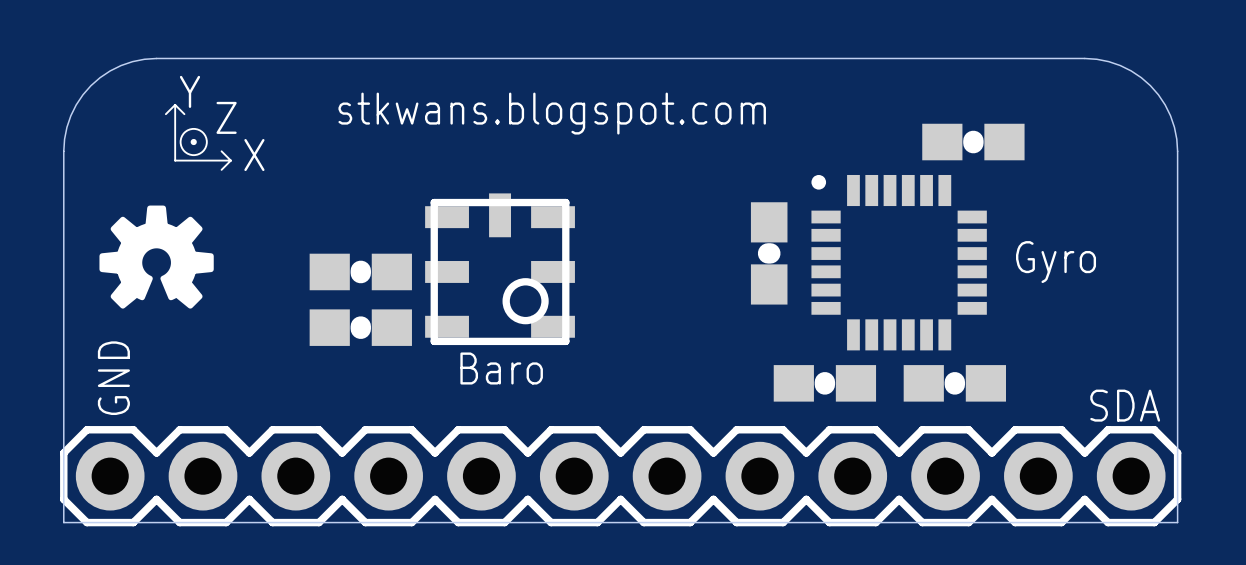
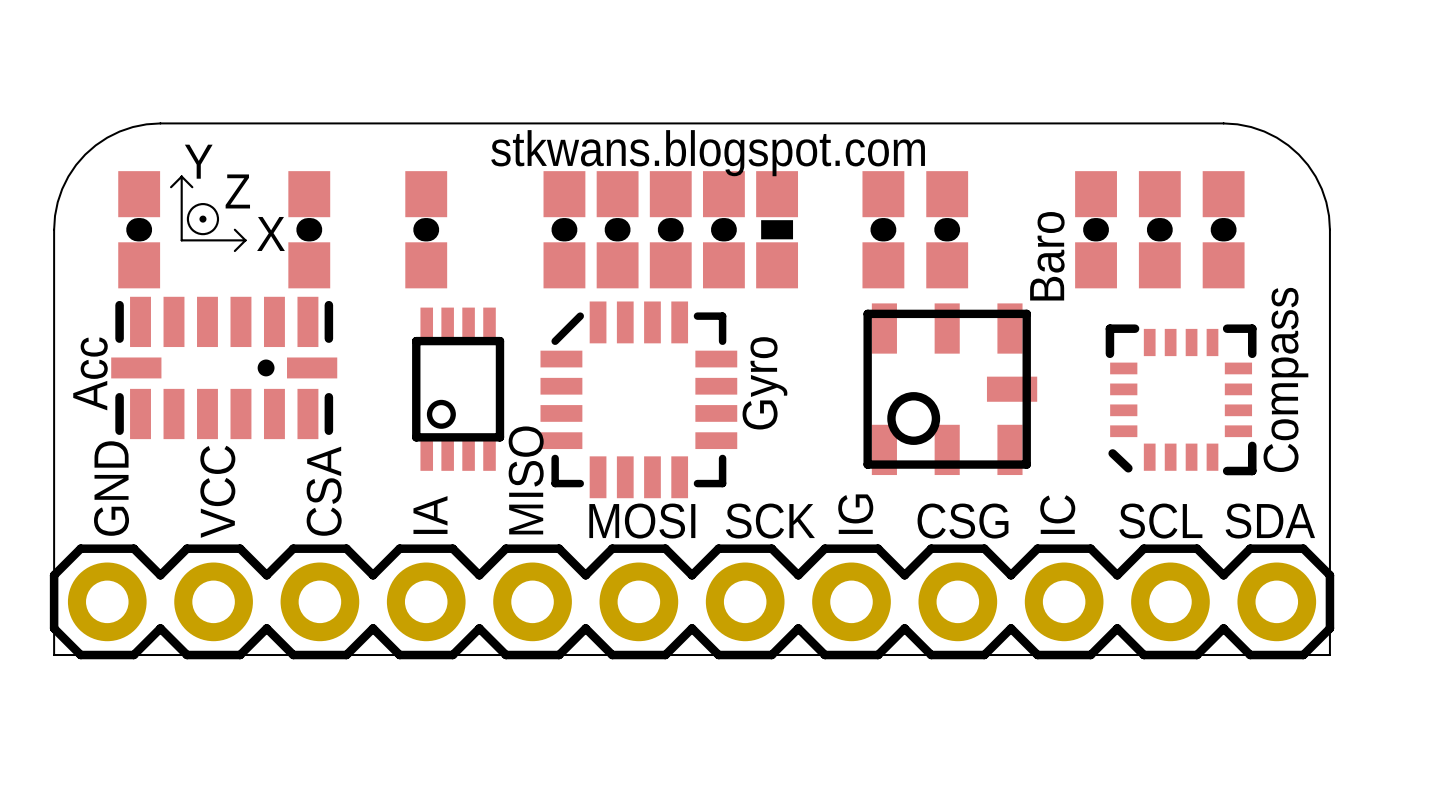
text position: stkwans.blogspot.com (552, 113) -> stkwans.blogspot.com (708, 153)
part rotation: 0° (973, 142) -> 90° clockwise (1096, 229)
part: none -> (139, 229)
part: none -> (309, 229)
part: none -> (426, 229)
part: none -> (564, 229)
part: none -> (617, 229)
part: none -> (670, 229)
part: none -> (723, 229)
part: none -> (777, 229)
part: none -> (883, 229)
part: none -> (947, 229)
part: none -> (1159, 229)
part: none -> (1223, 229)
drawing: [99, 205, 214, 309] -> none
part: (769, 253) -> none
part: (899, 262) -> none
text rotation: 0° (1056, 262) -> 90° counterclockwise (764, 383)
text position: Gyro (1056, 262) -> Gyro (764, 383)
part rotation: 0° (500, 269) -> 90° clockwise (950, 389)
part position: (500, 269) -> (950, 389)
part: none -> (224, 367)
part: (360, 271) -> none
text: none -> Acc (90, 373)
text: none -> Compass (1285, 379)
part: none -> (458, 389)
part: none -> (638, 399)
part: none -> (1181, 399)
part: (360, 327) -> none
text rotation: 0° (501, 368) -> 90° counterclockwise (1047, 256)
text position: Baro (501, 368) -> Baro (1047, 256)
text: none -> MISO (526, 480)
text: none -> CSA (324, 491)
text: none -> VCC (217, 491)
part: (824, 383) -> none
part: (954, 383) -> none
text: none -> IG (855, 514)
text: none -> IC (1057, 514)
text: none -> IA (430, 515)
text: none -> MOSI (642, 521)
text: none -> SCK (770, 521)
text: none -> CSG (962, 521)
text: none -> SCL (1160, 521)

